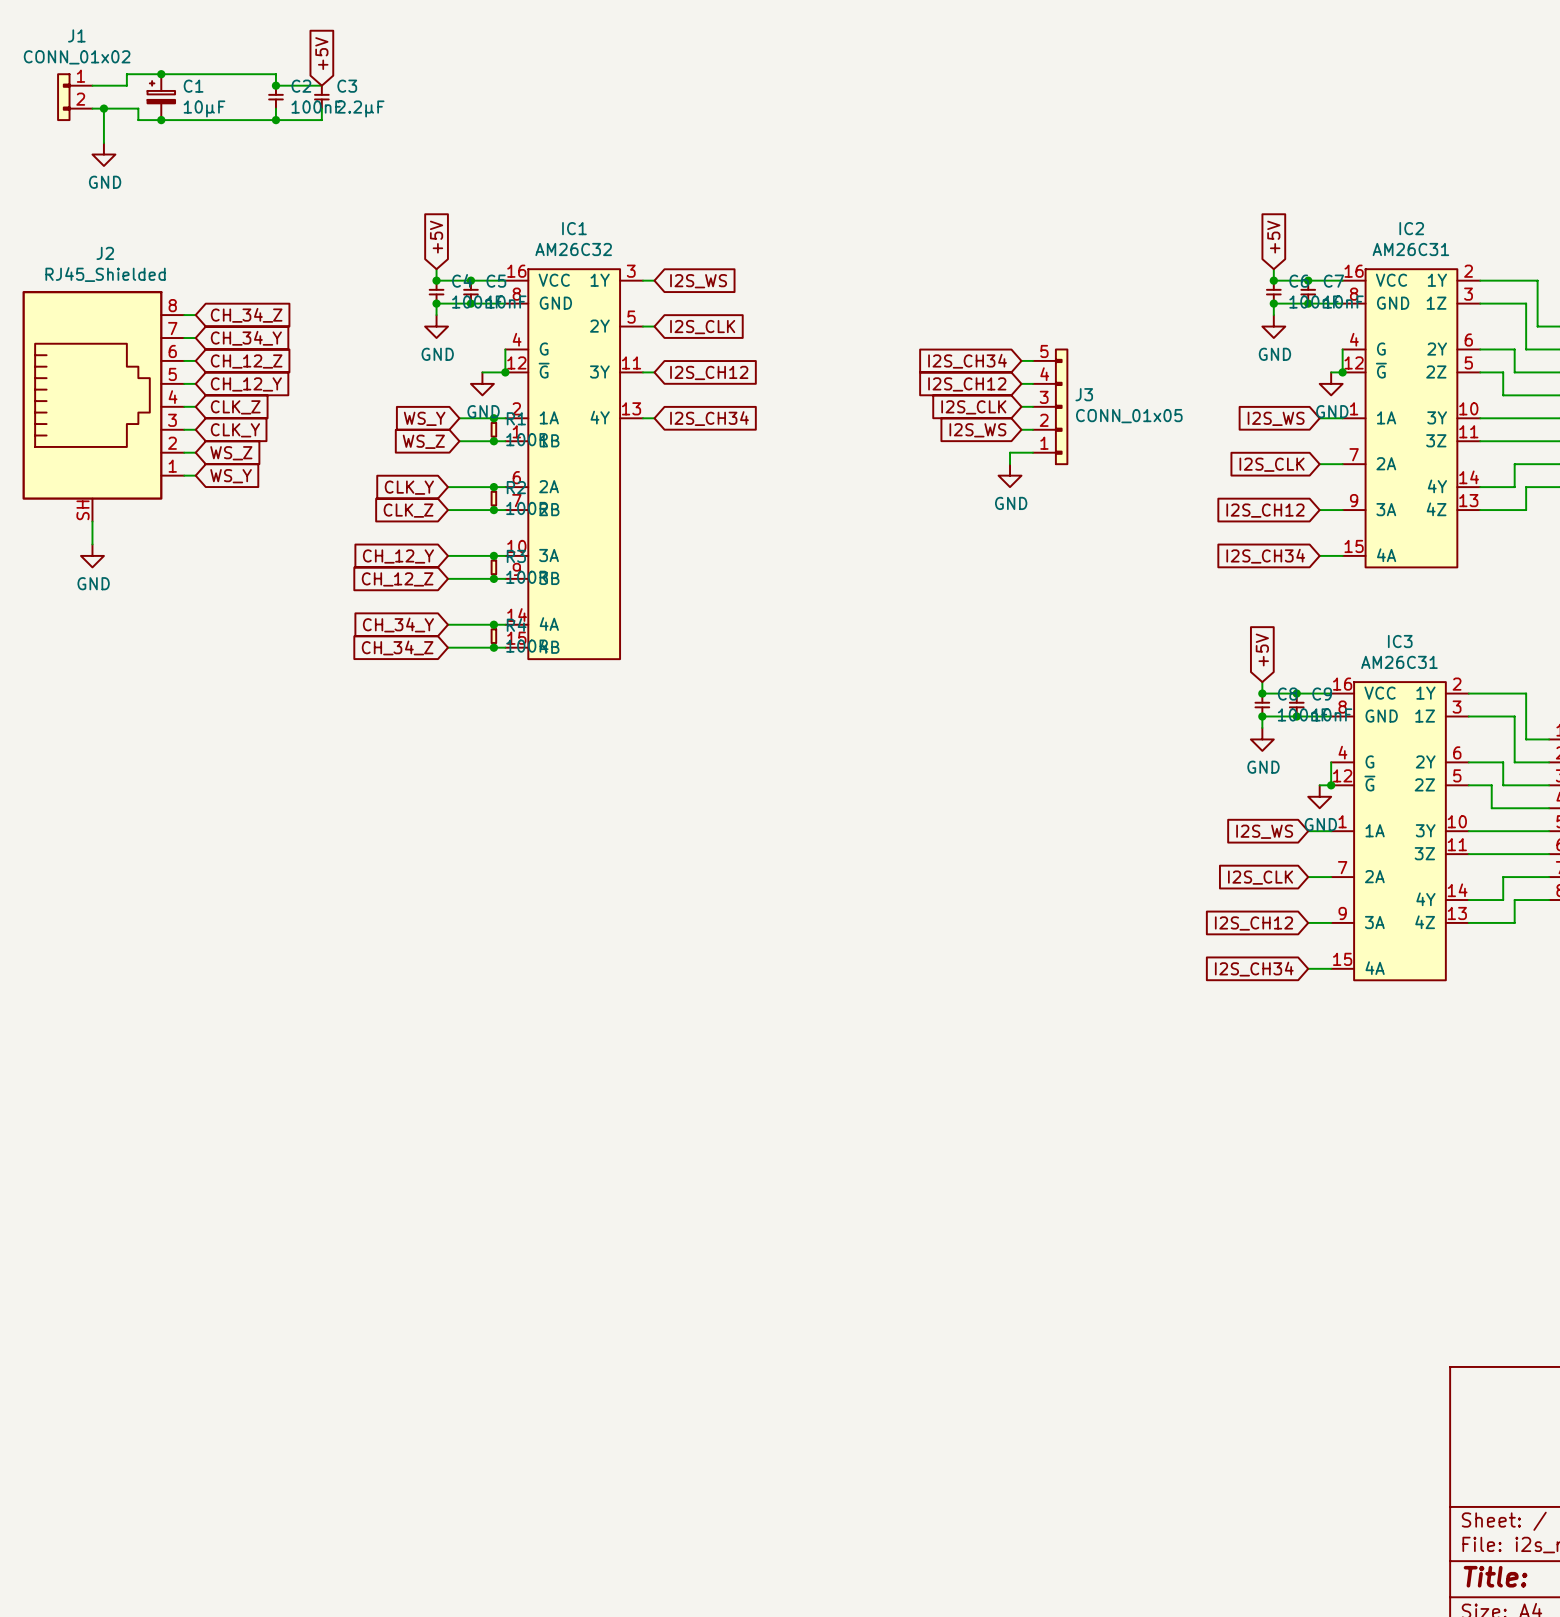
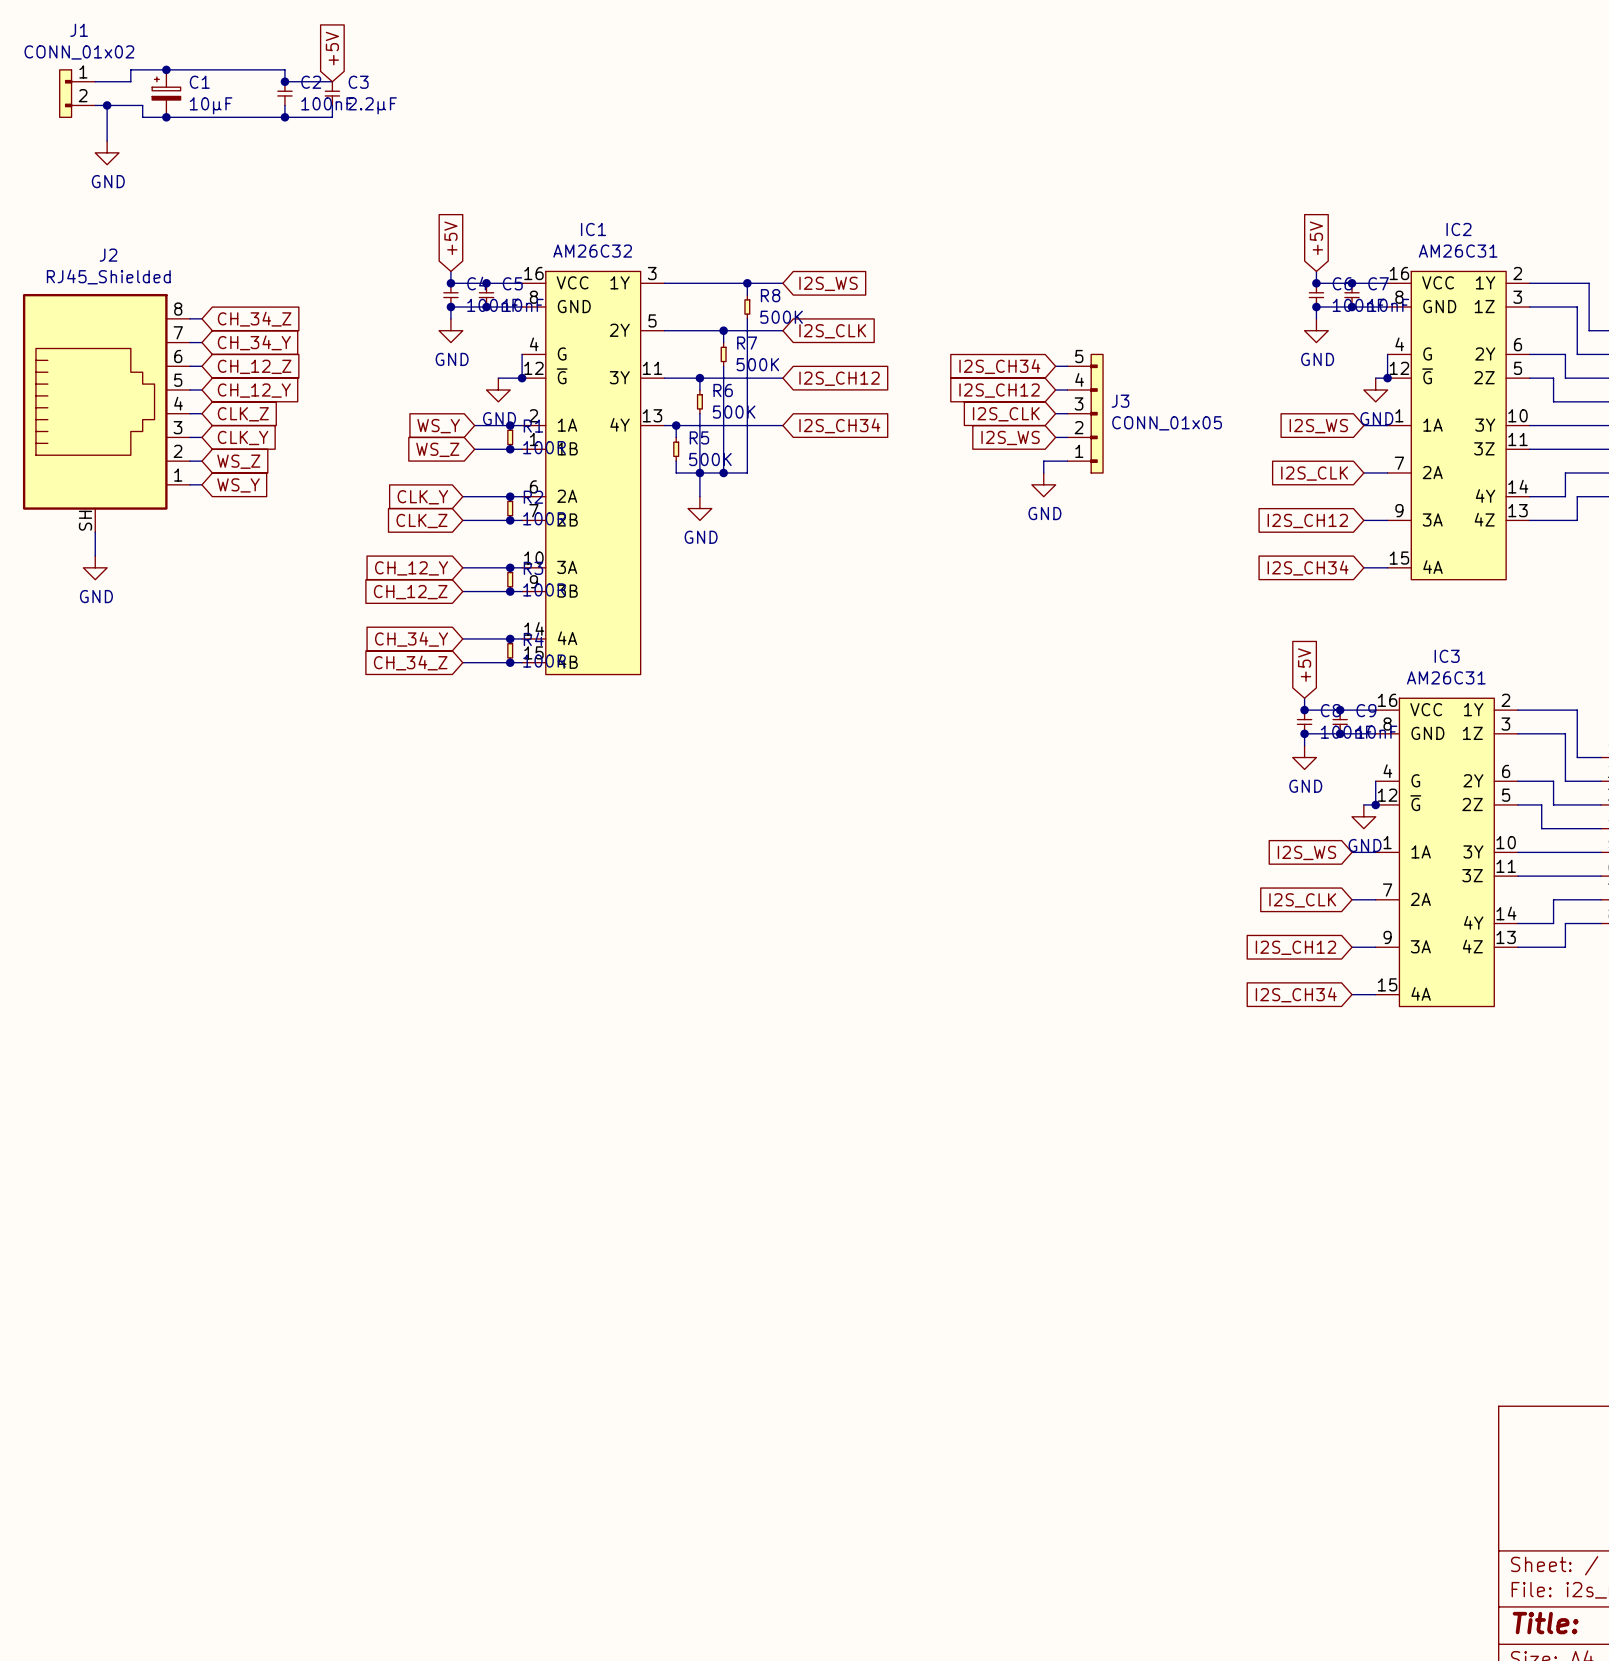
wire: none -> (676, 283) (782, 283)
wire: none -> (747, 283) (747, 295)
junction: none -> (747, 283)
global label position: I2S_WS (698, 281) -> I2S_WS (828, 283)
R8: none -> 500K (747, 307)
wire: none -> (747, 318) (747, 472) (676, 472) (676, 461)
wire: none -> (676, 330) (782, 330)
wire: none -> (723, 330) (723, 342)
junction: none -> (723, 330)
global label position: I2S_CLK (702, 327) -> I2S_CLK (832, 331)
R7: none -> 500K (723, 354)
wire: none -> (723, 366) (723, 472)
wire: none -> (676, 378) (782, 378)
wire: none -> (699, 378) (699, 390)
junction: none -> (699, 378)
global label position: I2S_CH12 (709, 372) -> I2S_CH12 (839, 378)
R6: none -> 500K (699, 401)
wire: none -> (699, 413) (699, 496)
junction: none -> (676, 425)
global label position: I2S_CH34 (709, 418) -> I2S_CH34 (839, 425)
wire: none -> (782, 425) (676, 425) (676, 437)
R5: none -> 500K (676, 449)
junction: none -> (699, 472)
junction: none -> (723, 472)
power symbol: none -> GND (699, 508)

